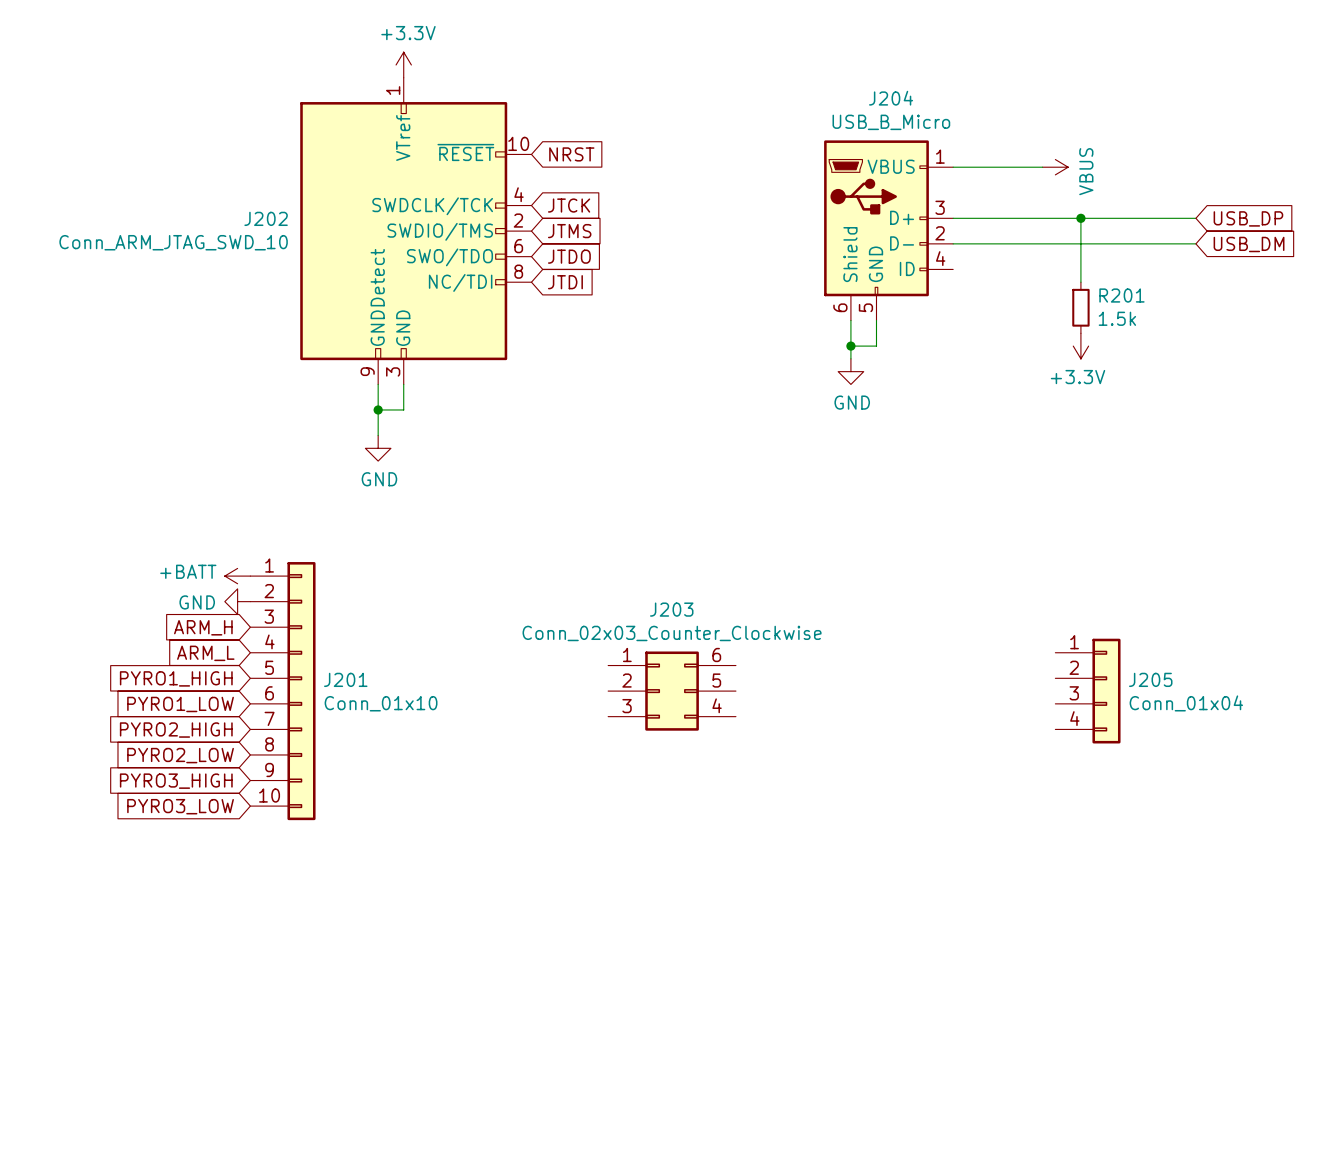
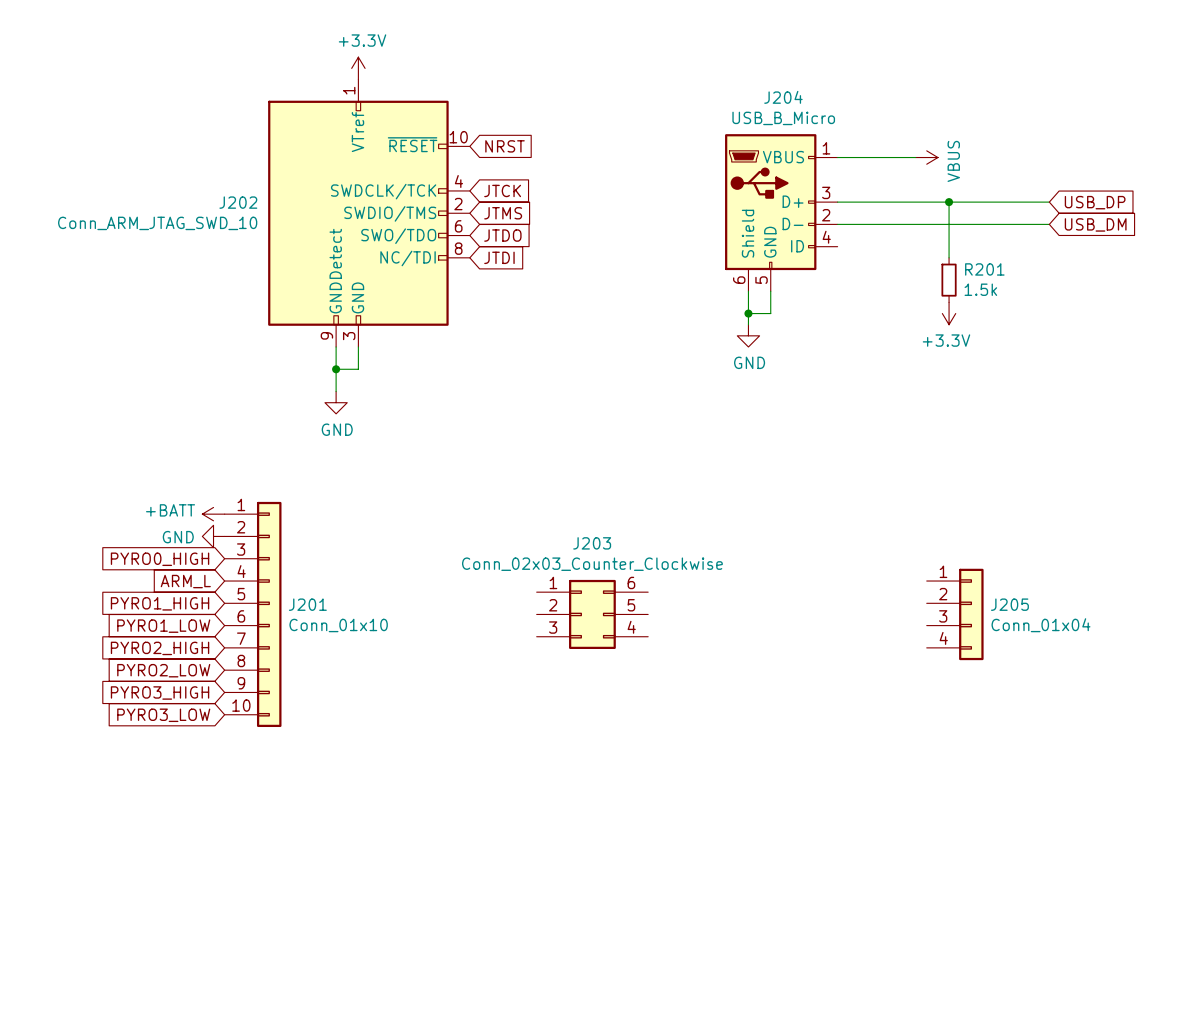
global label: ARM_H (203, 627) -> PYRO0_HIGH (160, 559)

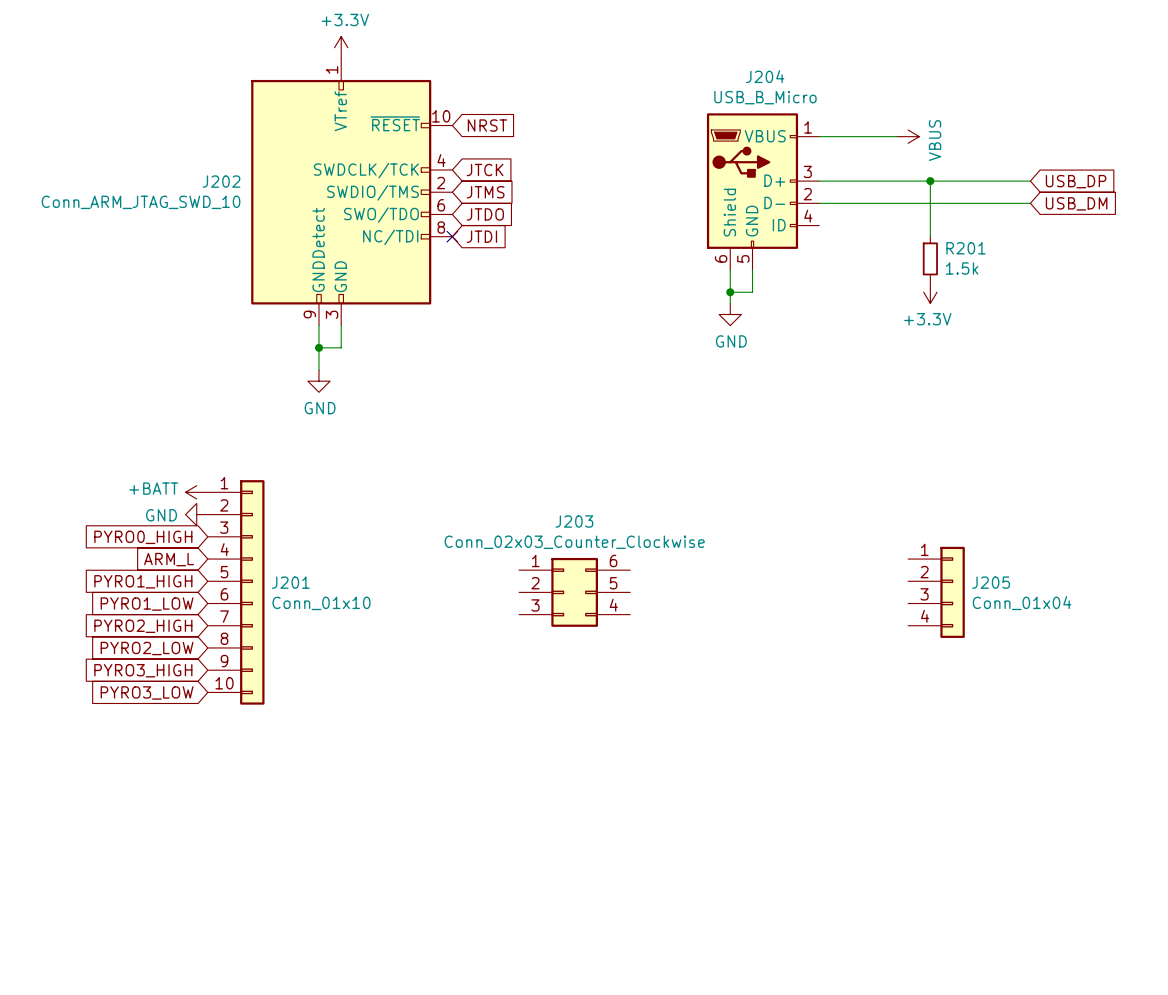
no-connect mark: none -> (452, 236)

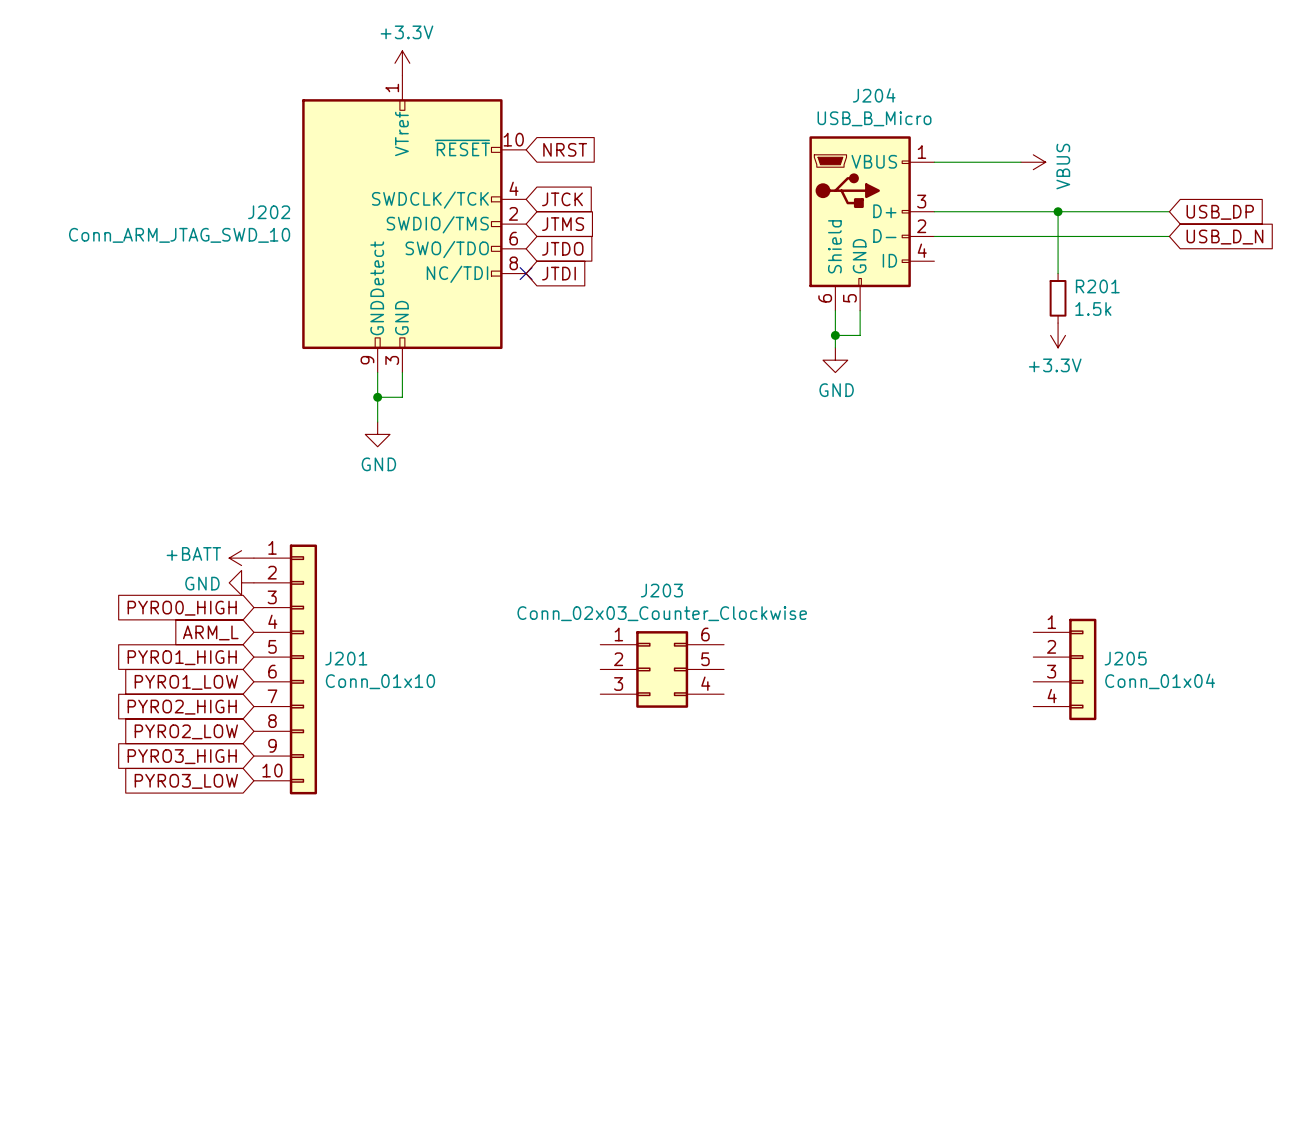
global label: USB_DM (1076, 203) -> USB_D_N (1224, 237)

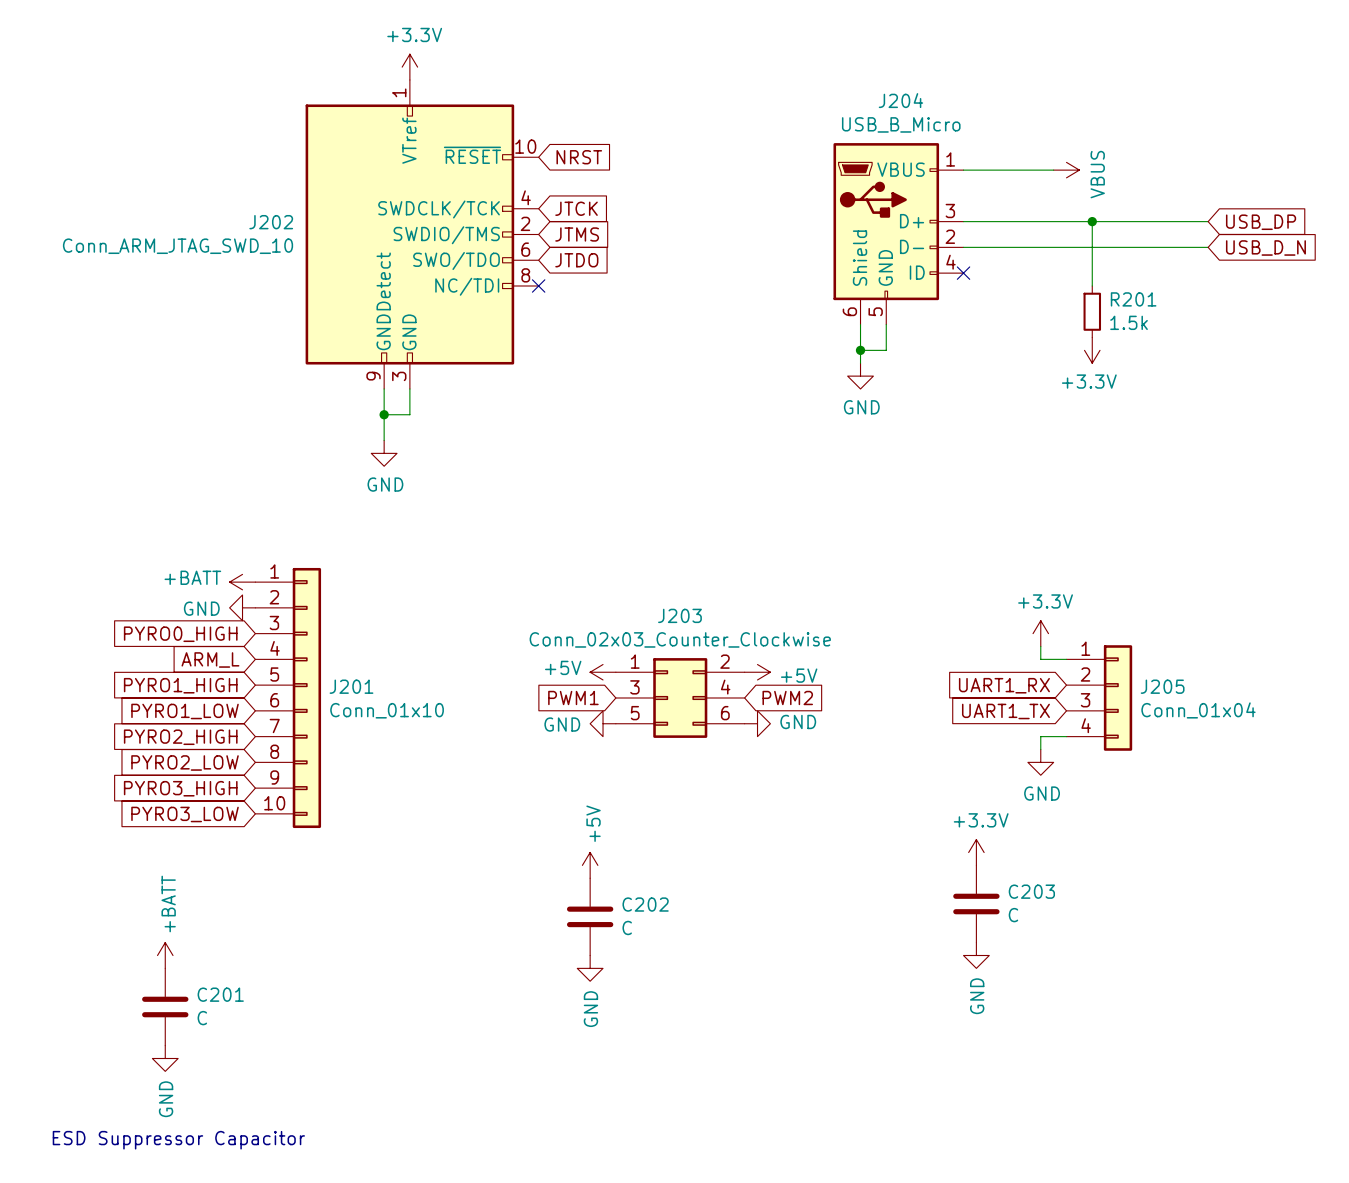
no-connect mark: none -> (963, 273)
global label: JTDI (558, 273) -> none
power symbol: none -> +3.3V (1040, 633)
wire: none -> (1040, 646) (1040, 659) (1066, 659)
J203 pin number: 6 (705, 634) -> 2 (725, 661)
power symbol: none -> +5V (603, 672)
power symbol: none -> +5V (757, 672)
global label: none -> UART1_RX (1004, 685)
J203 pin number: 2 (618, 659) -> 3 (634, 687)
J203 pin number: 5 (705, 659) -> 4 (725, 687)
global label: none -> PWM1 (573, 697)
global label: none -> PWM2 (787, 697)
global label: none -> UART1_TX (1005, 711)
J203 pin number: 3 (618, 683) -> 5 (635, 713)
J203 pin number: 4 (705, 683) -> 6 (725, 713)
power symbol: none -> GND (603, 723)
power symbol: none -> GND (757, 723)
wire: none -> (1066, 736) (1040, 736) (1040, 749)
power symbol: none -> GND (1040, 762)
power symbol: none -> +3.3V (976, 852)
power symbol: none -> +5V (590, 865)
C203: none -> C (976, 903)
C202: none -> C (590, 916)
power symbol: none -> +BATT (165, 955)
power symbol: none -> GND (976, 955)
power symbol: none -> GND (590, 968)
C201: none -> C (165, 1006)
power symbol: none -> GND (165, 1058)
text: none -> ESD Suppressor Capacitor (178, 1140)

